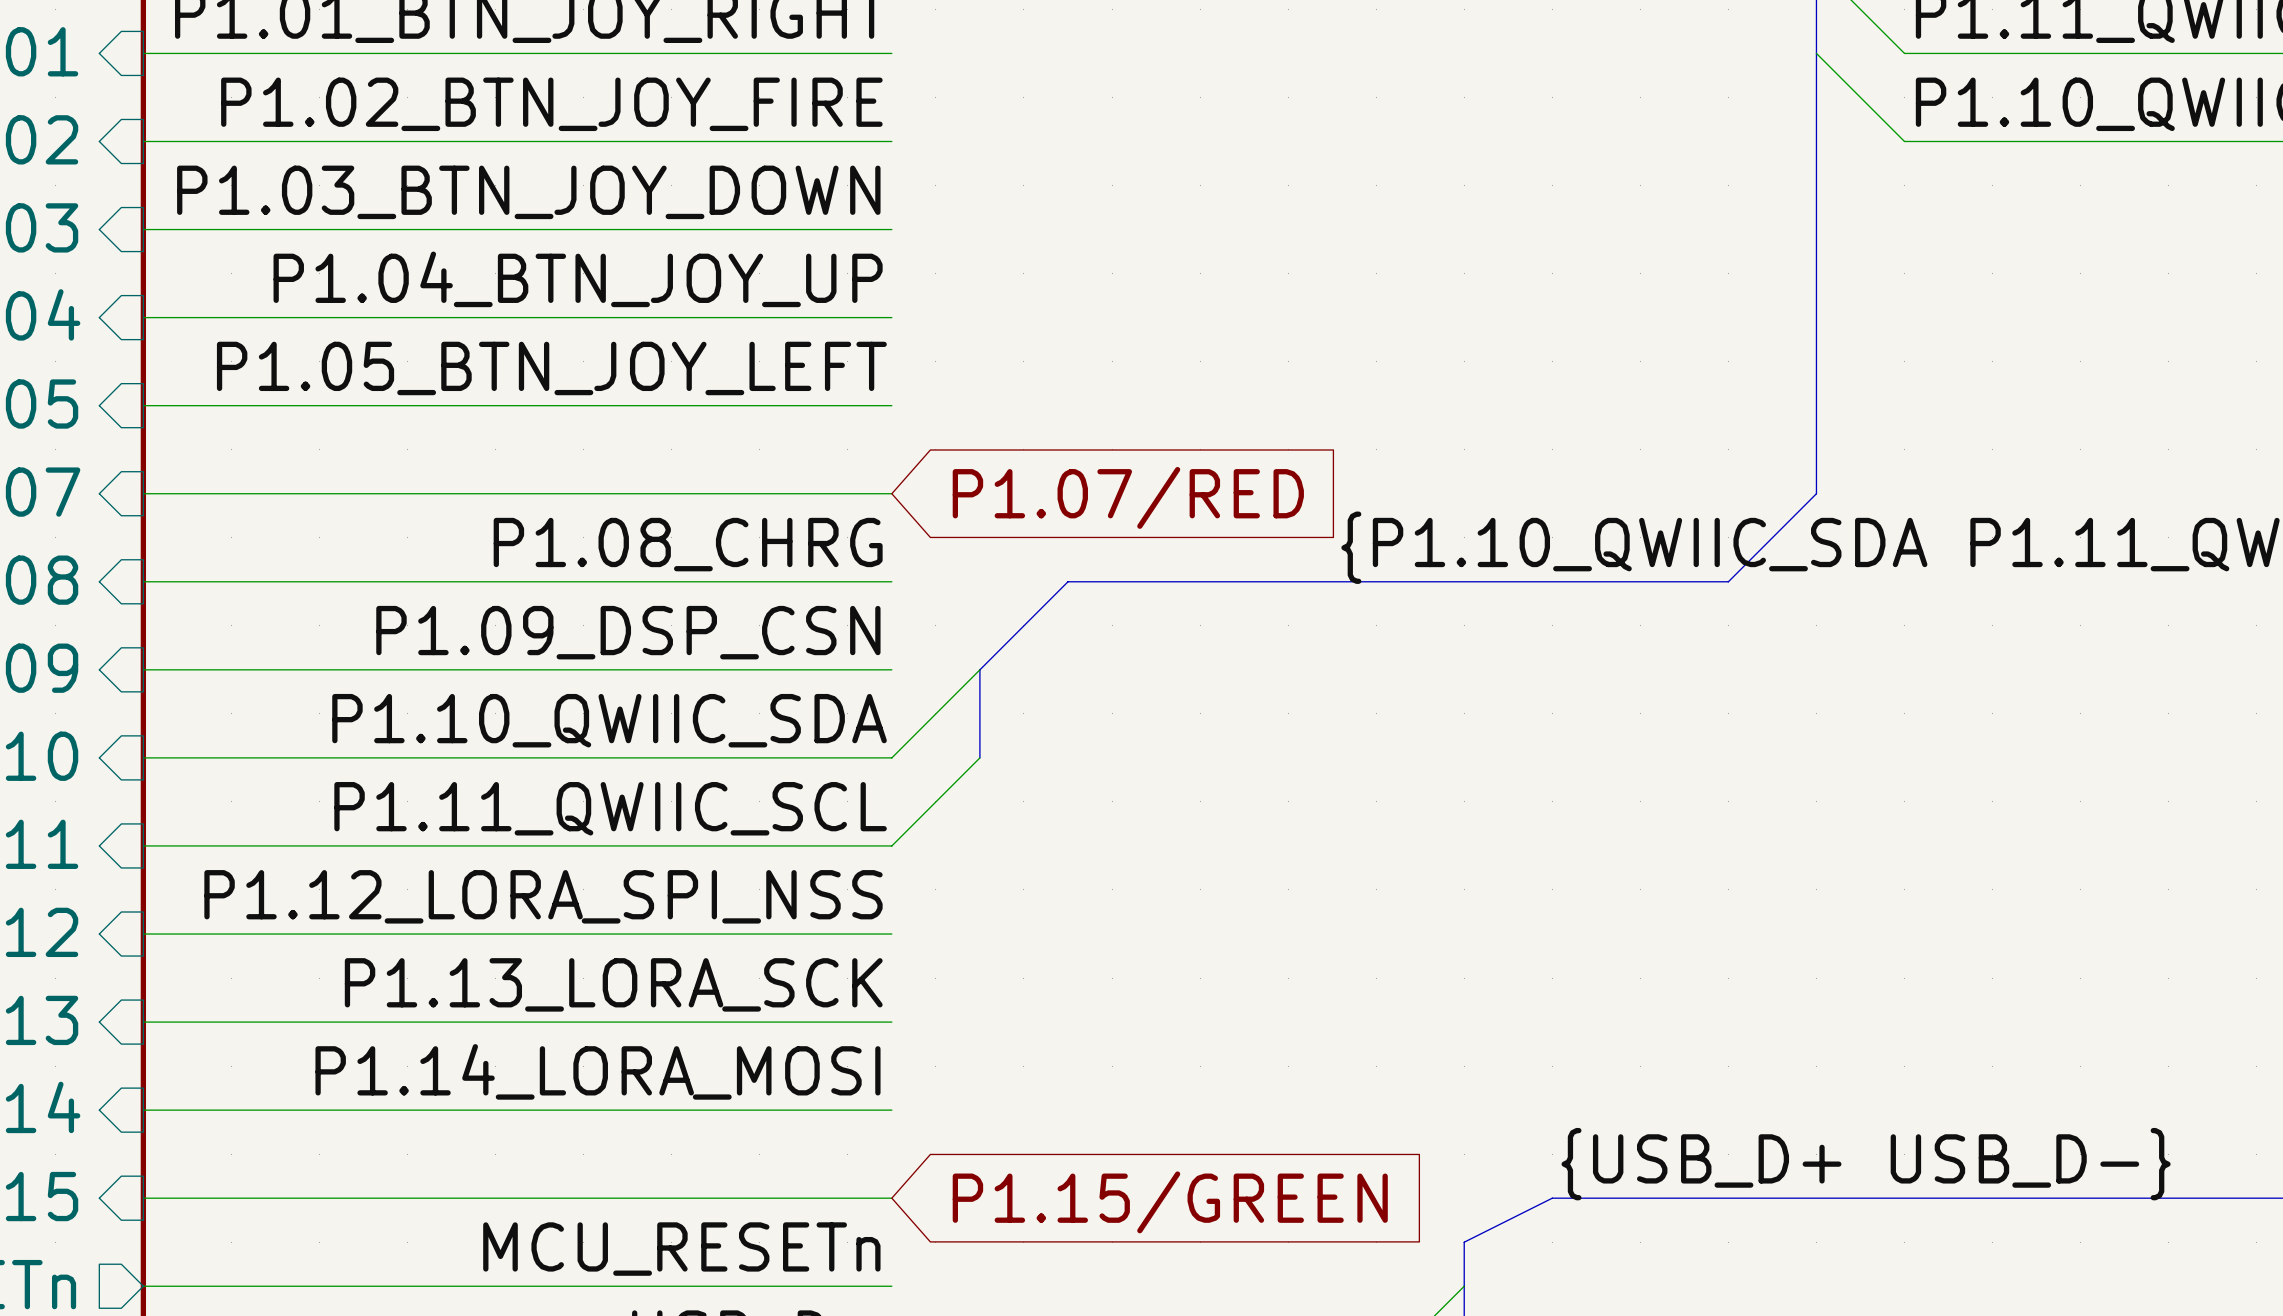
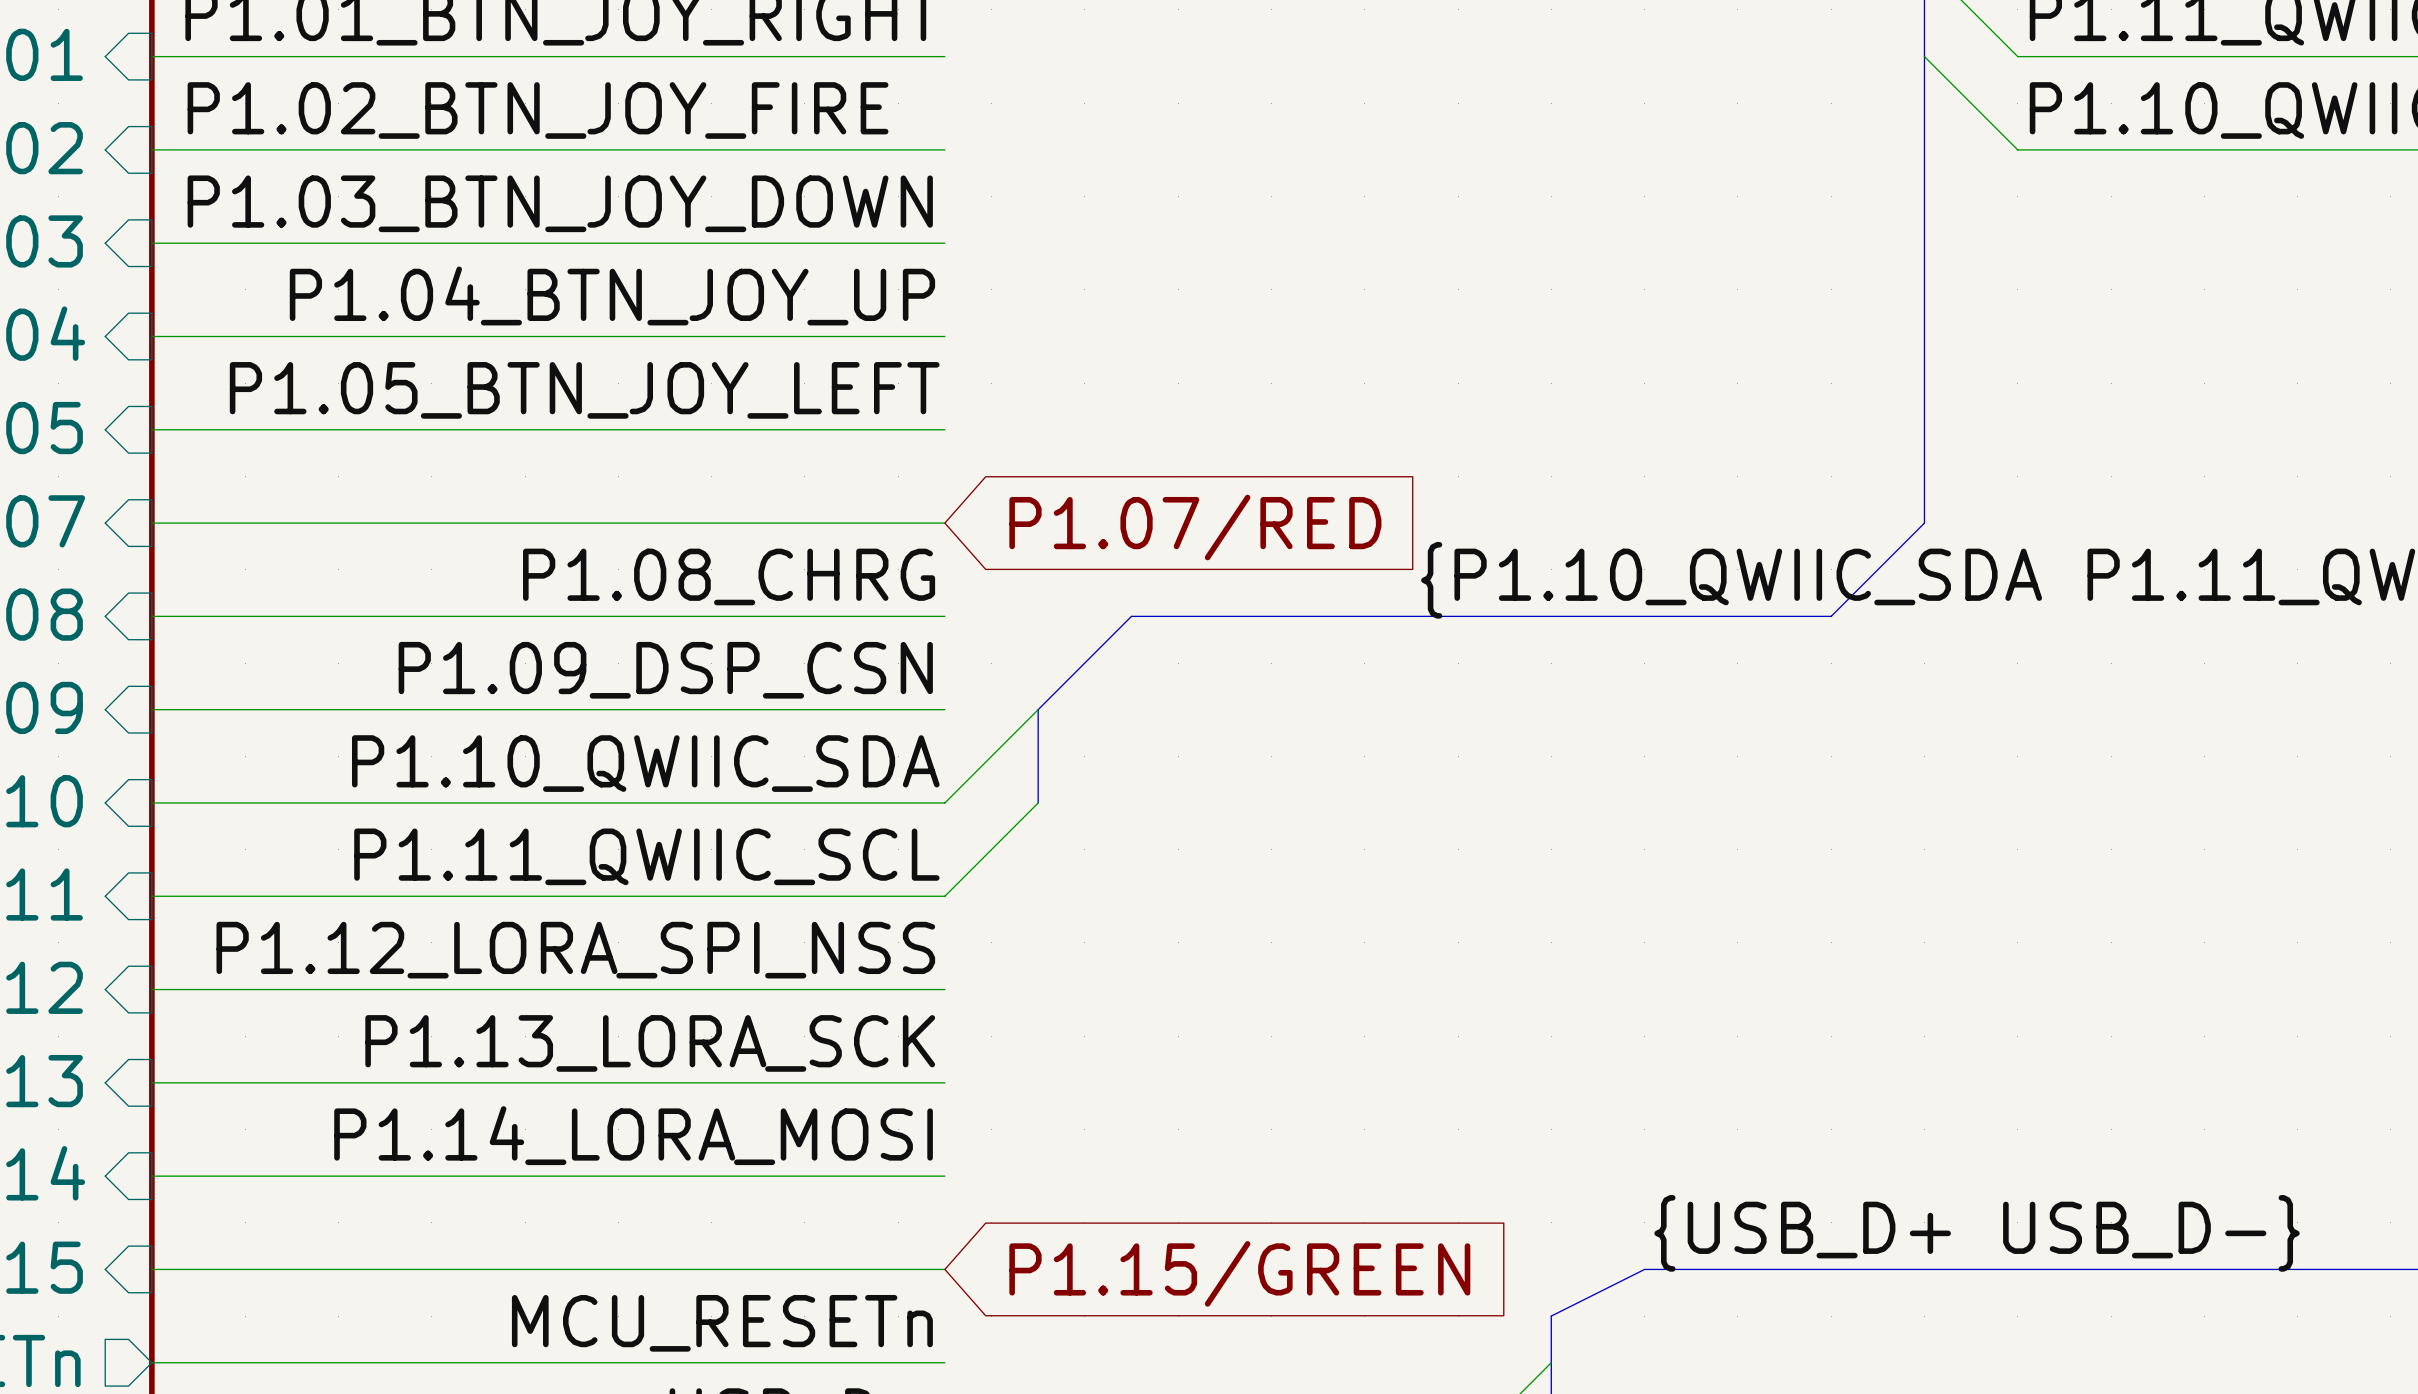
label position: P1.02_BTN_JOY_FIRE (551, 104) -> P1.02_BTN_JOY_FIRE (538, 110)

